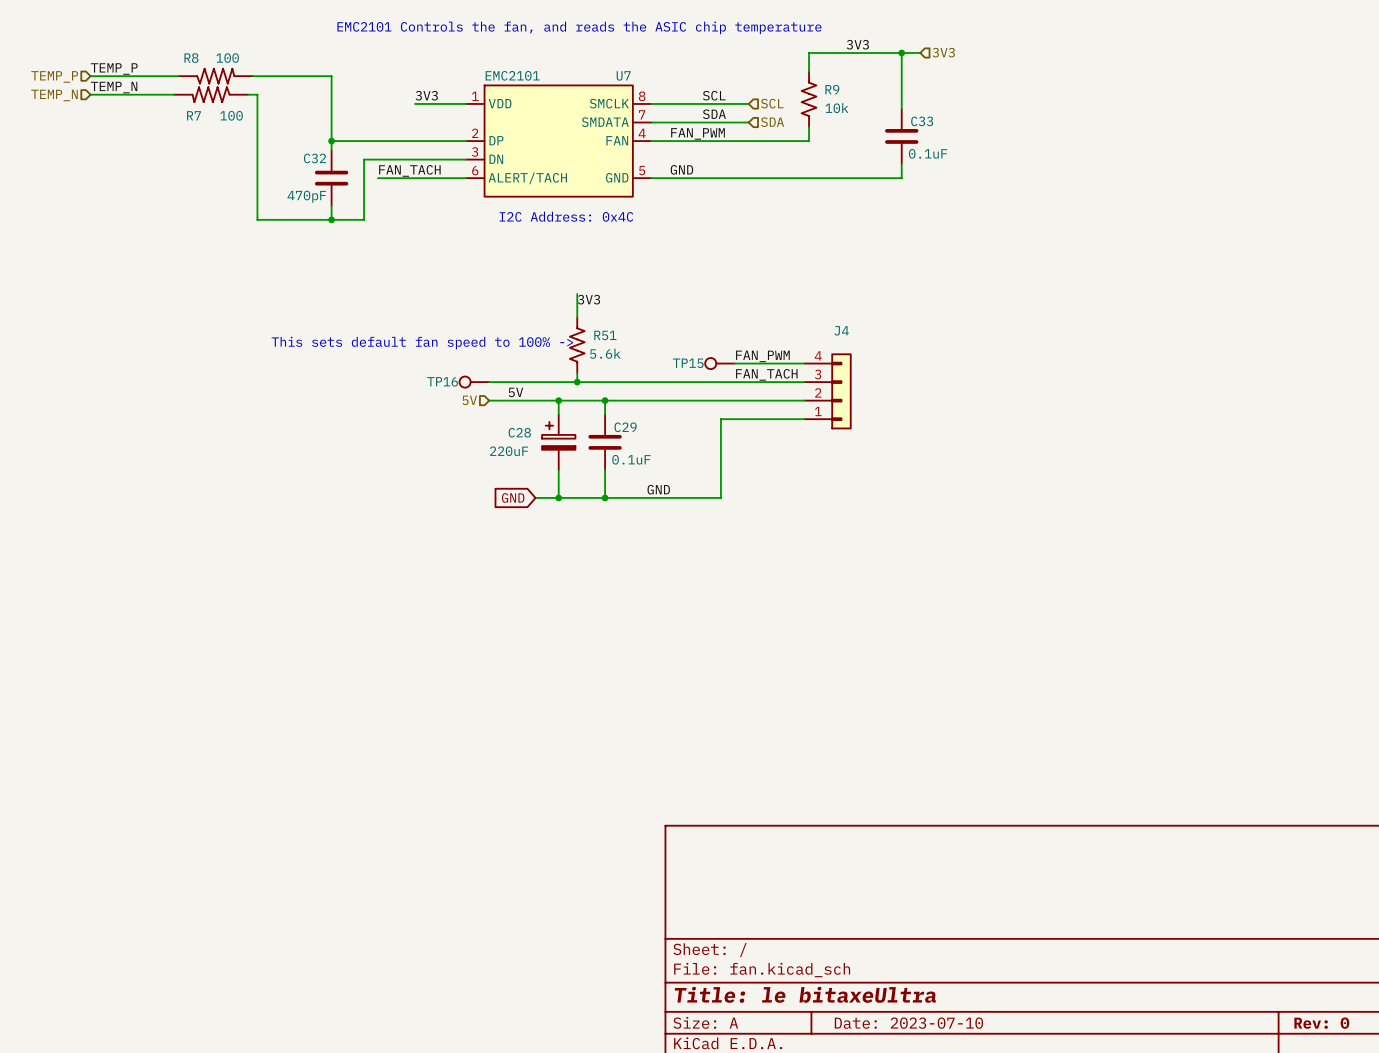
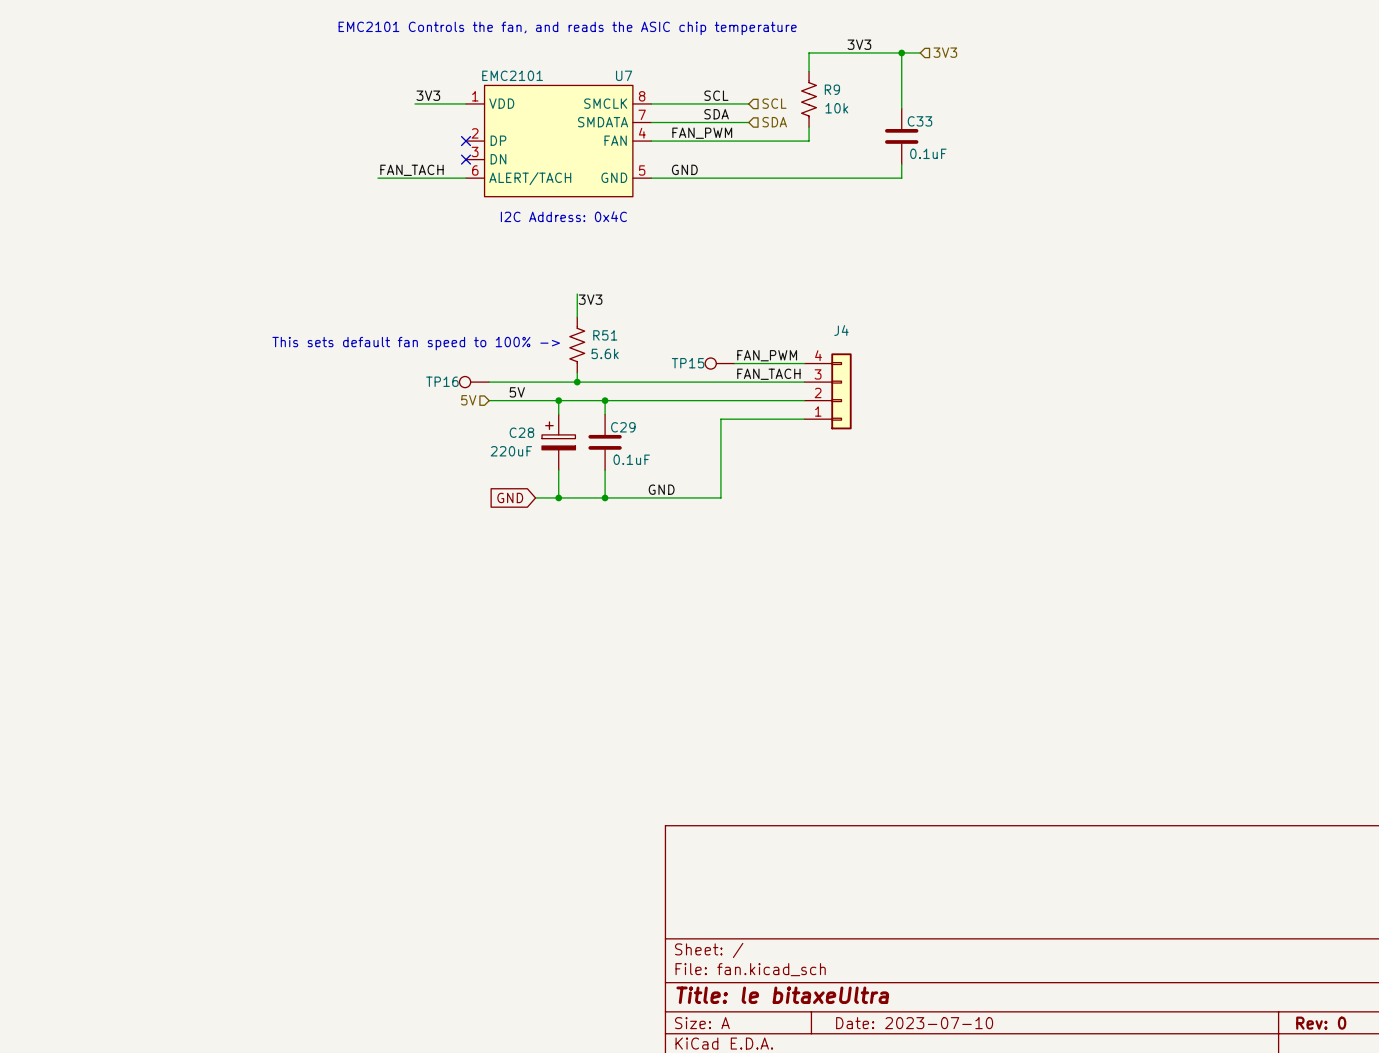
label: TEMP_P (114, 69) -> none
hierarchical label: TEMP_P (54, 76) -> none
wire: (90, 76) (178, 76) -> none
R8: 100 (215, 76) -> none
wire: (252, 76) (331, 76) (331, 150) -> none
label: TEMP_N (114, 87) -> none
wire: (90, 94) (173, 94) -> none
R7: 100 (211, 94) -> none
wire: (248, 94) (257, 94) (257, 219) (364, 219) (364, 159) (466, 159) -> none
hierarchical label: TEMP_N (54, 95) -> none
wire: (331, 141) (466, 141) -> none
junction: (331, 141) -> none
no-connect mark: none -> (466, 141)
no-connect mark: none -> (466, 159)
C32: 470pF (331, 178) -> none
wire: (331, 205) (331, 219) -> none
junction: (331, 219) -> none

